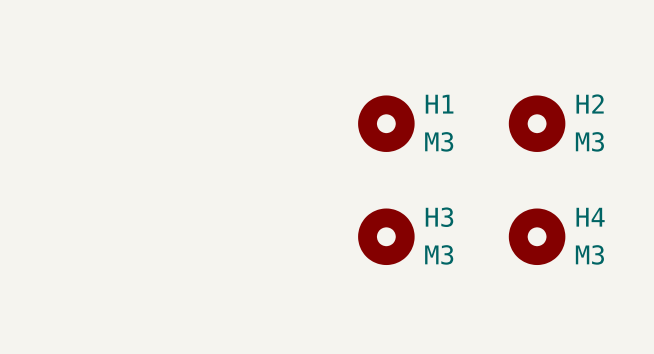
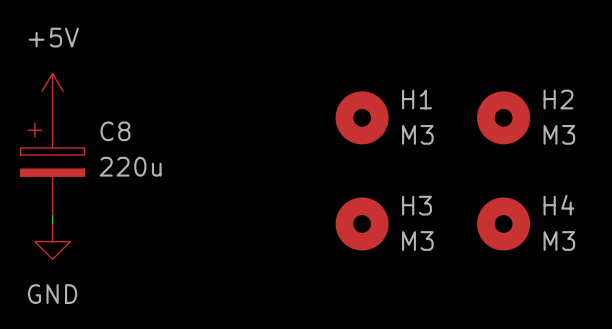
power symbol: none -> +5V (52, 91)
C8: none -> 220u (52, 162)
wire: none -> (52, 215) (52, 223)
power symbol: none -> GND (52, 241)

